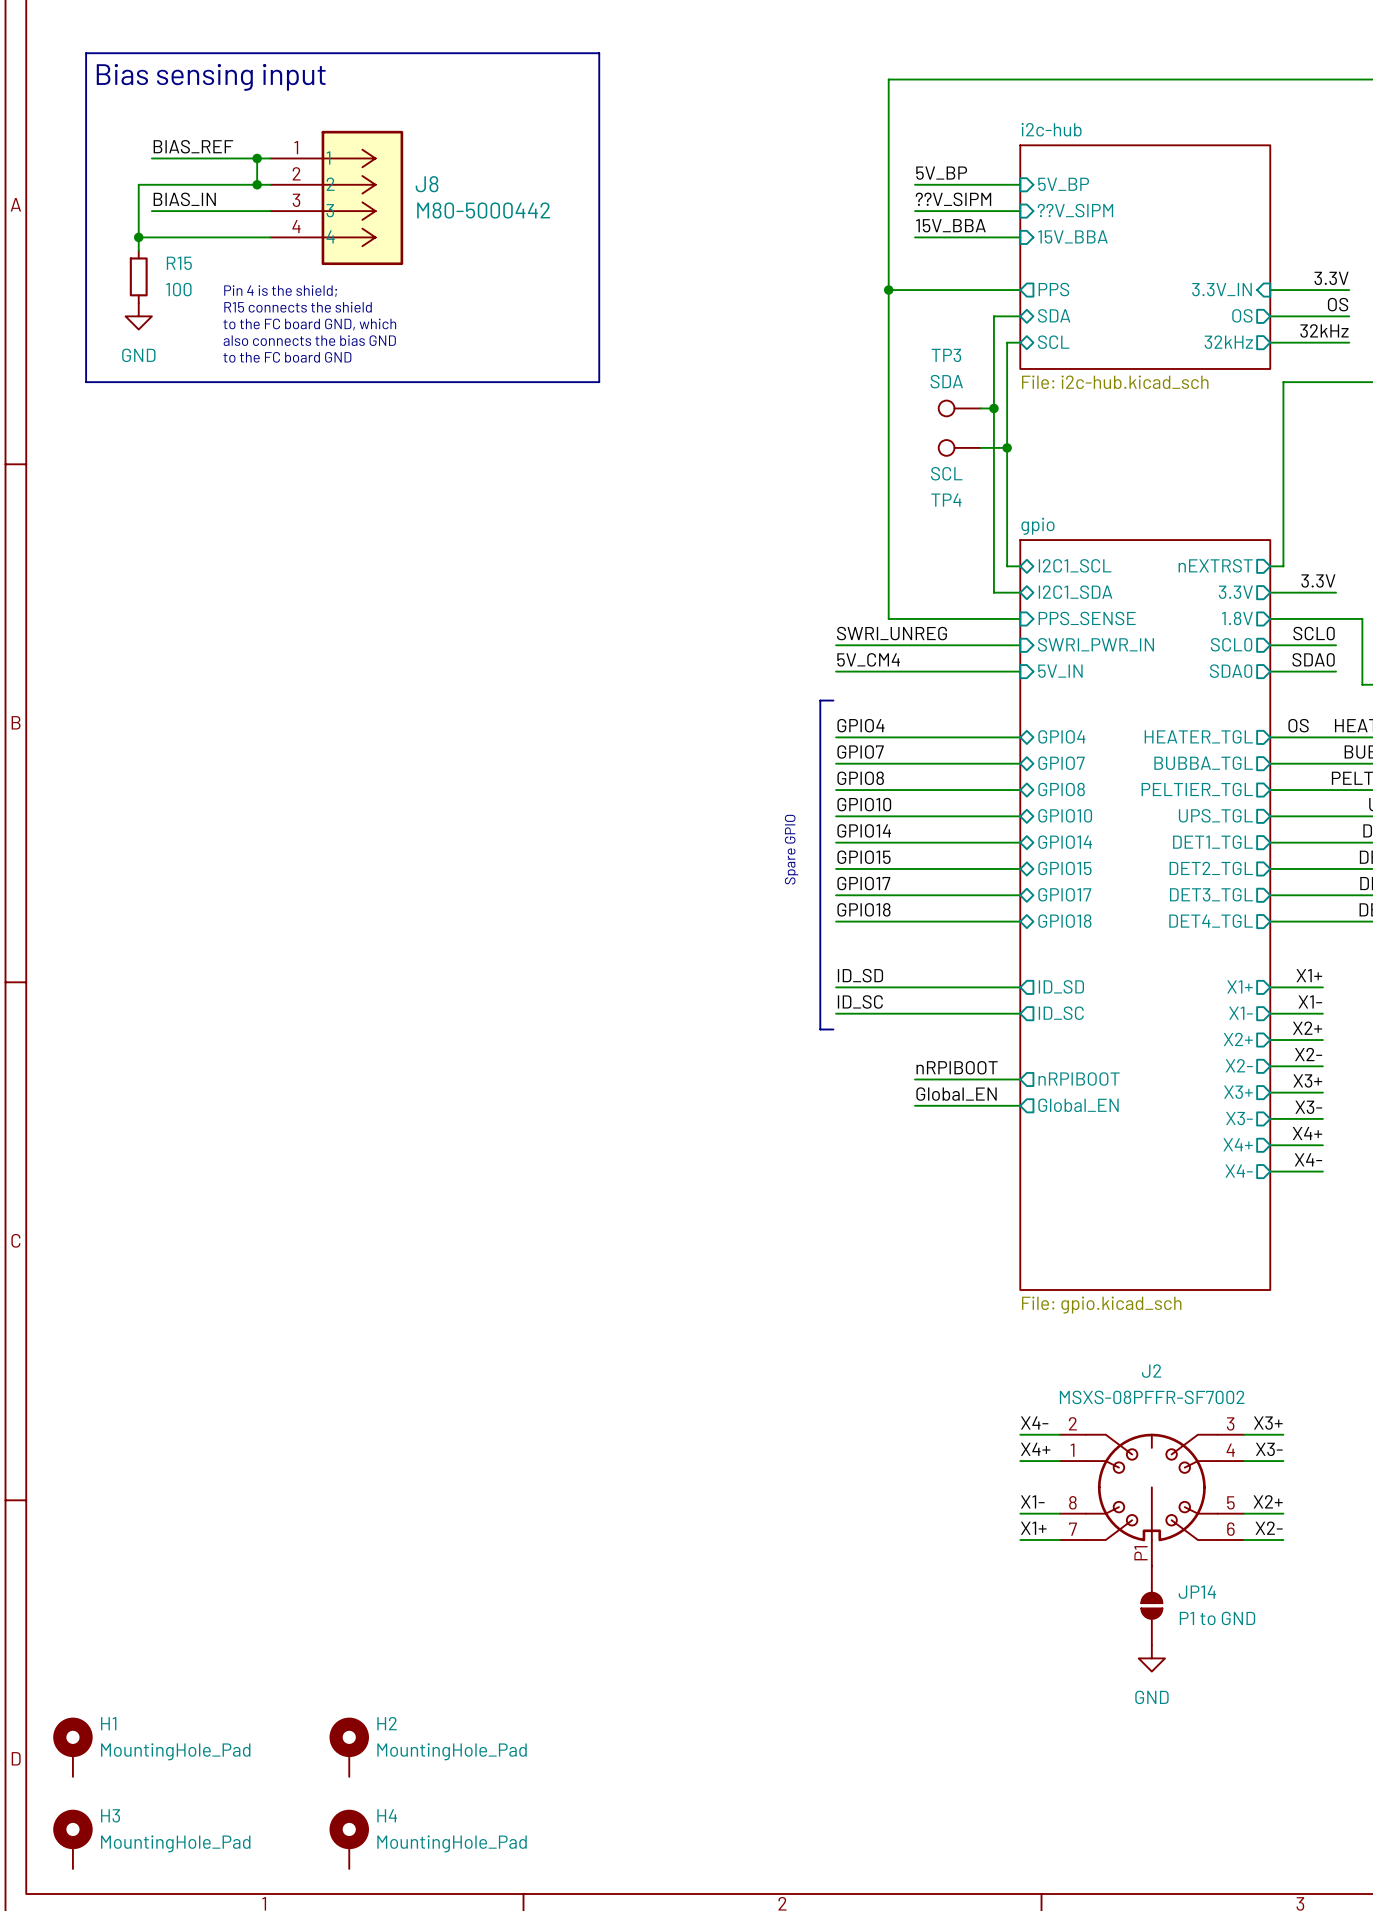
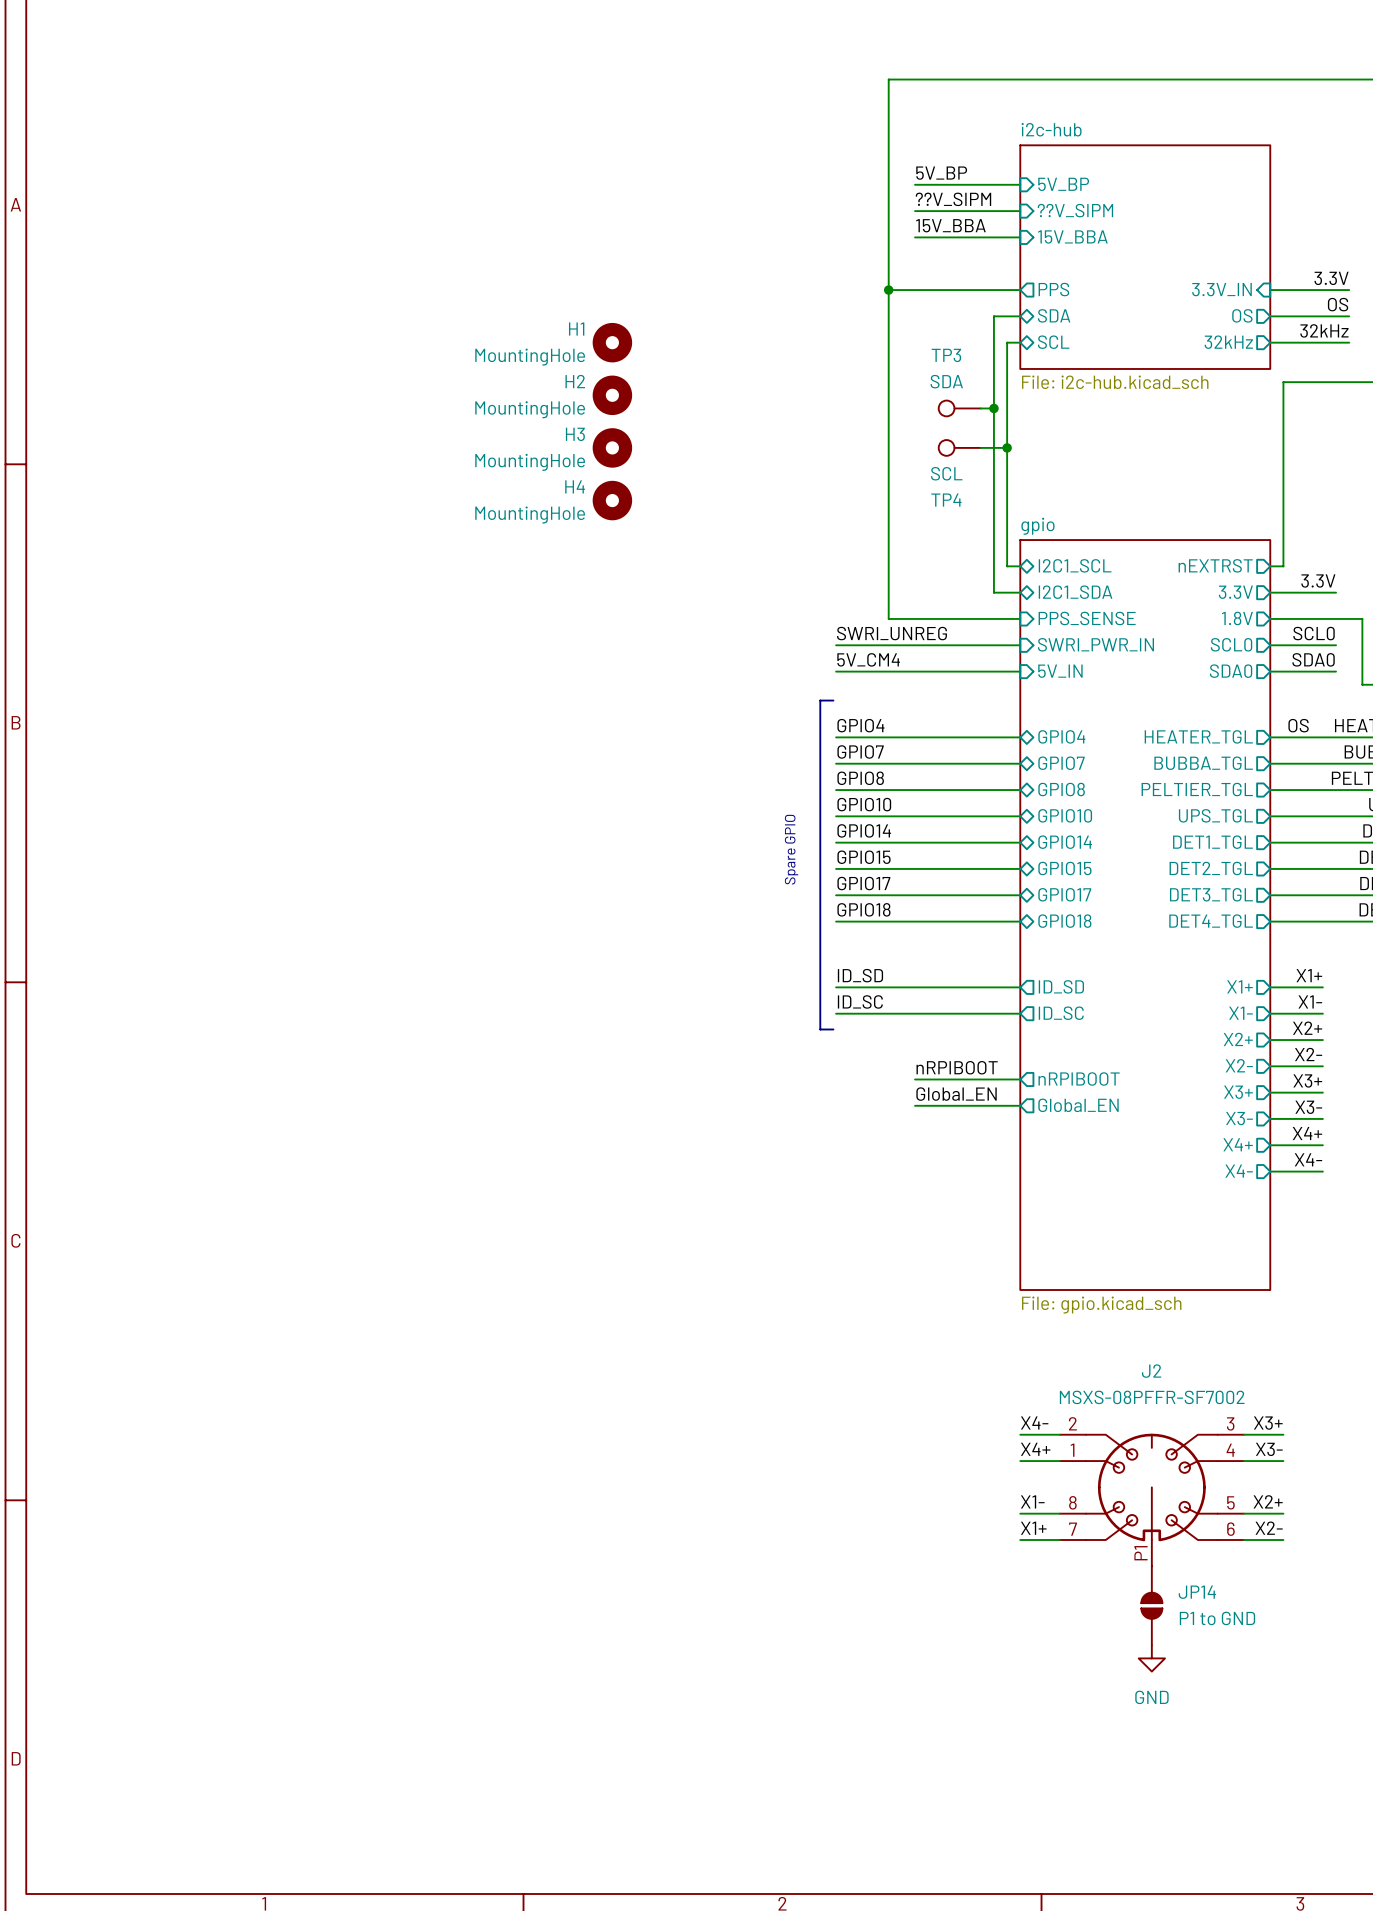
line: (86, 53) (599, 53) (599, 382) (86, 382) (86, 53) -> none
text: Bias sensing input (211, 77) -> none
label: BIAS_REF (193, 146) -> none
wire: (151, 158) (270, 158) -> none
wire: (257, 158) (257, 184) -> none
junction: (257, 158) -> none
junction: (257, 184) -> none
wire: (270, 184) (138, 184) (138, 250) -> none
J8: M80-5000442 (336, 197) -> none
label: BIAS_IN (184, 199) -> none
wire: (151, 211) (270, 211) -> none
wire: (138, 237) (270, 237) -> none
junction: (138, 237) -> none
R15: 100 (138, 276) -> none
text: Pin 4 is the shield; (280, 291) -> none
text: R15 connects the shield (298, 307) -> none
power symbol: GND (138, 316) -> none
text: to the FC board GND, which (309, 324) -> none
text: also connects the bias GND (309, 340) -> none
text: to the FC board GND (287, 357) -> none
H1 symbol: [53, 1717, 93, 1777] -> [592, 322, 633, 363]
H2 symbol: [329, 1717, 369, 1777] -> [592, 375, 633, 416]
H1 name position: H1 (108, 1723) -> H1 (576, 329)
H2 name position: H2 (387, 1723) -> H2 (575, 381)
H1 value: MountingHole_Pad (175, 1751) -> MountingHole (530, 357)
H2 value: MountingHole_Pad (452, 1751) -> MountingHole (530, 409)
H3 symbol: [53, 1809, 93, 1869] -> [592, 428, 633, 468]
H4 symbol: [329, 1809, 369, 1869] -> [592, 480, 633, 521]
H3 name position: H3 (110, 1815) -> H3 (575, 434)
H4 name position: H4 (387, 1815) -> H4 (575, 486)
H3 value: MountingHole_Pad (175, 1843) -> MountingHole (530, 462)
H4 value: MountingHole_Pad (452, 1843) -> MountingHole (530, 515)

